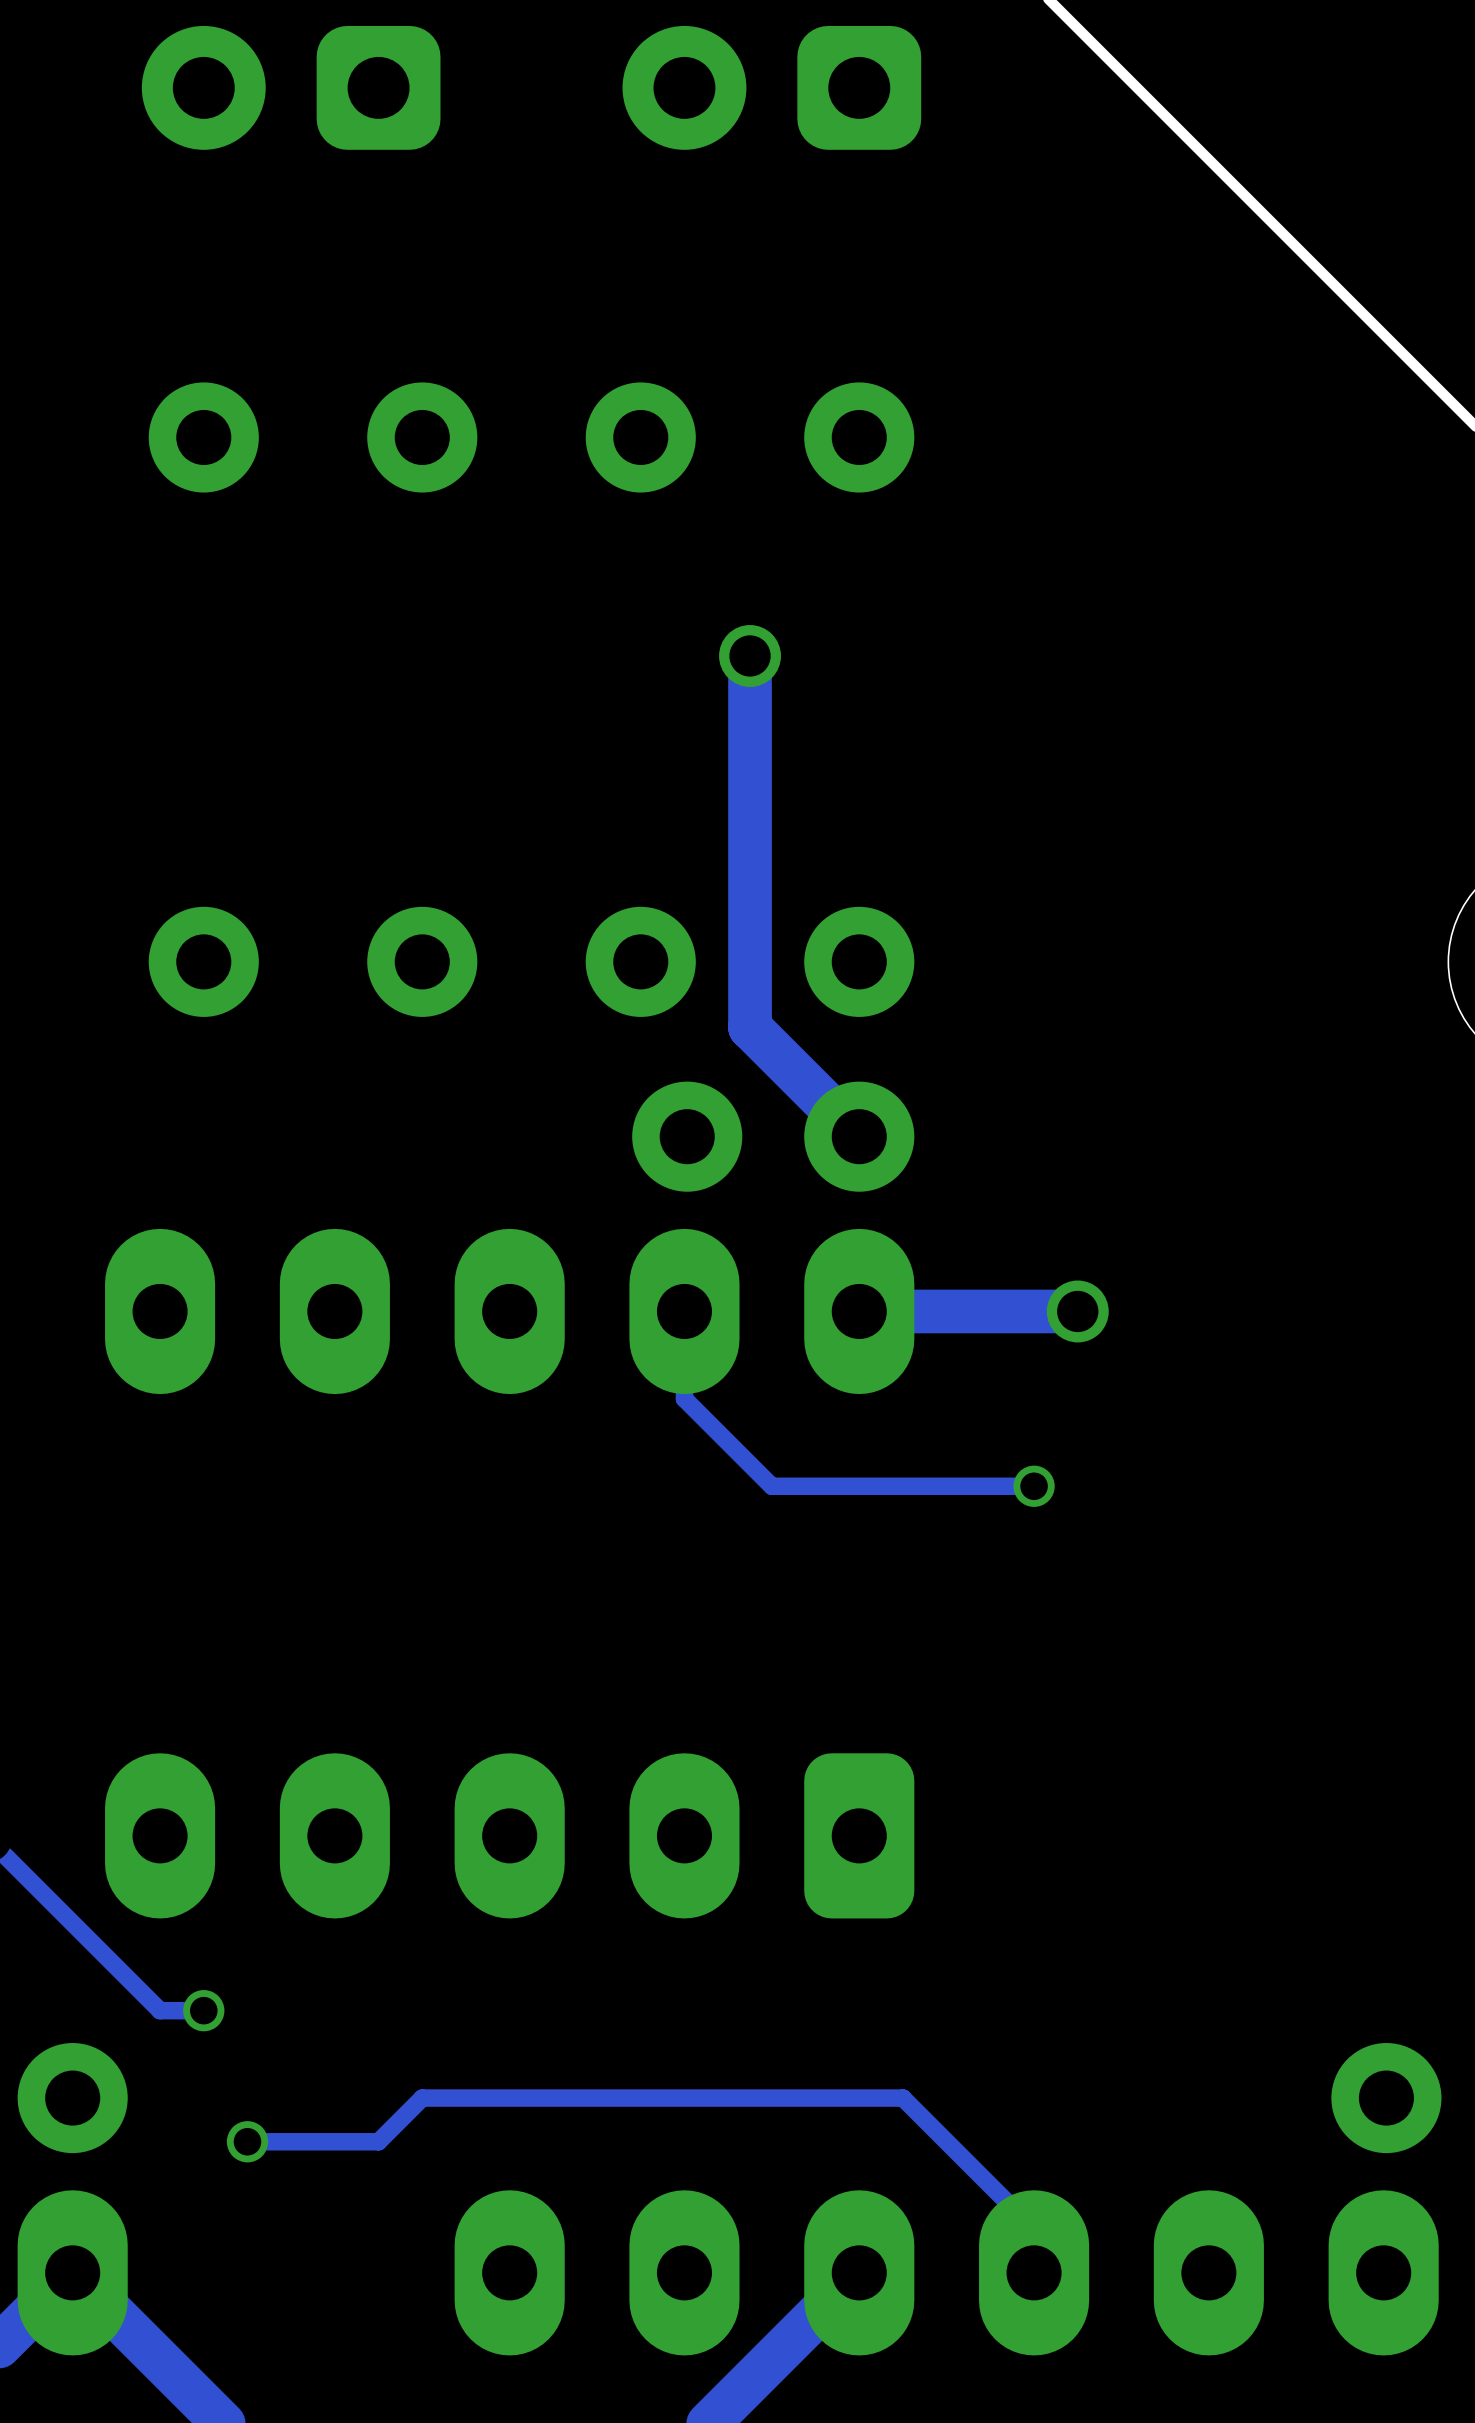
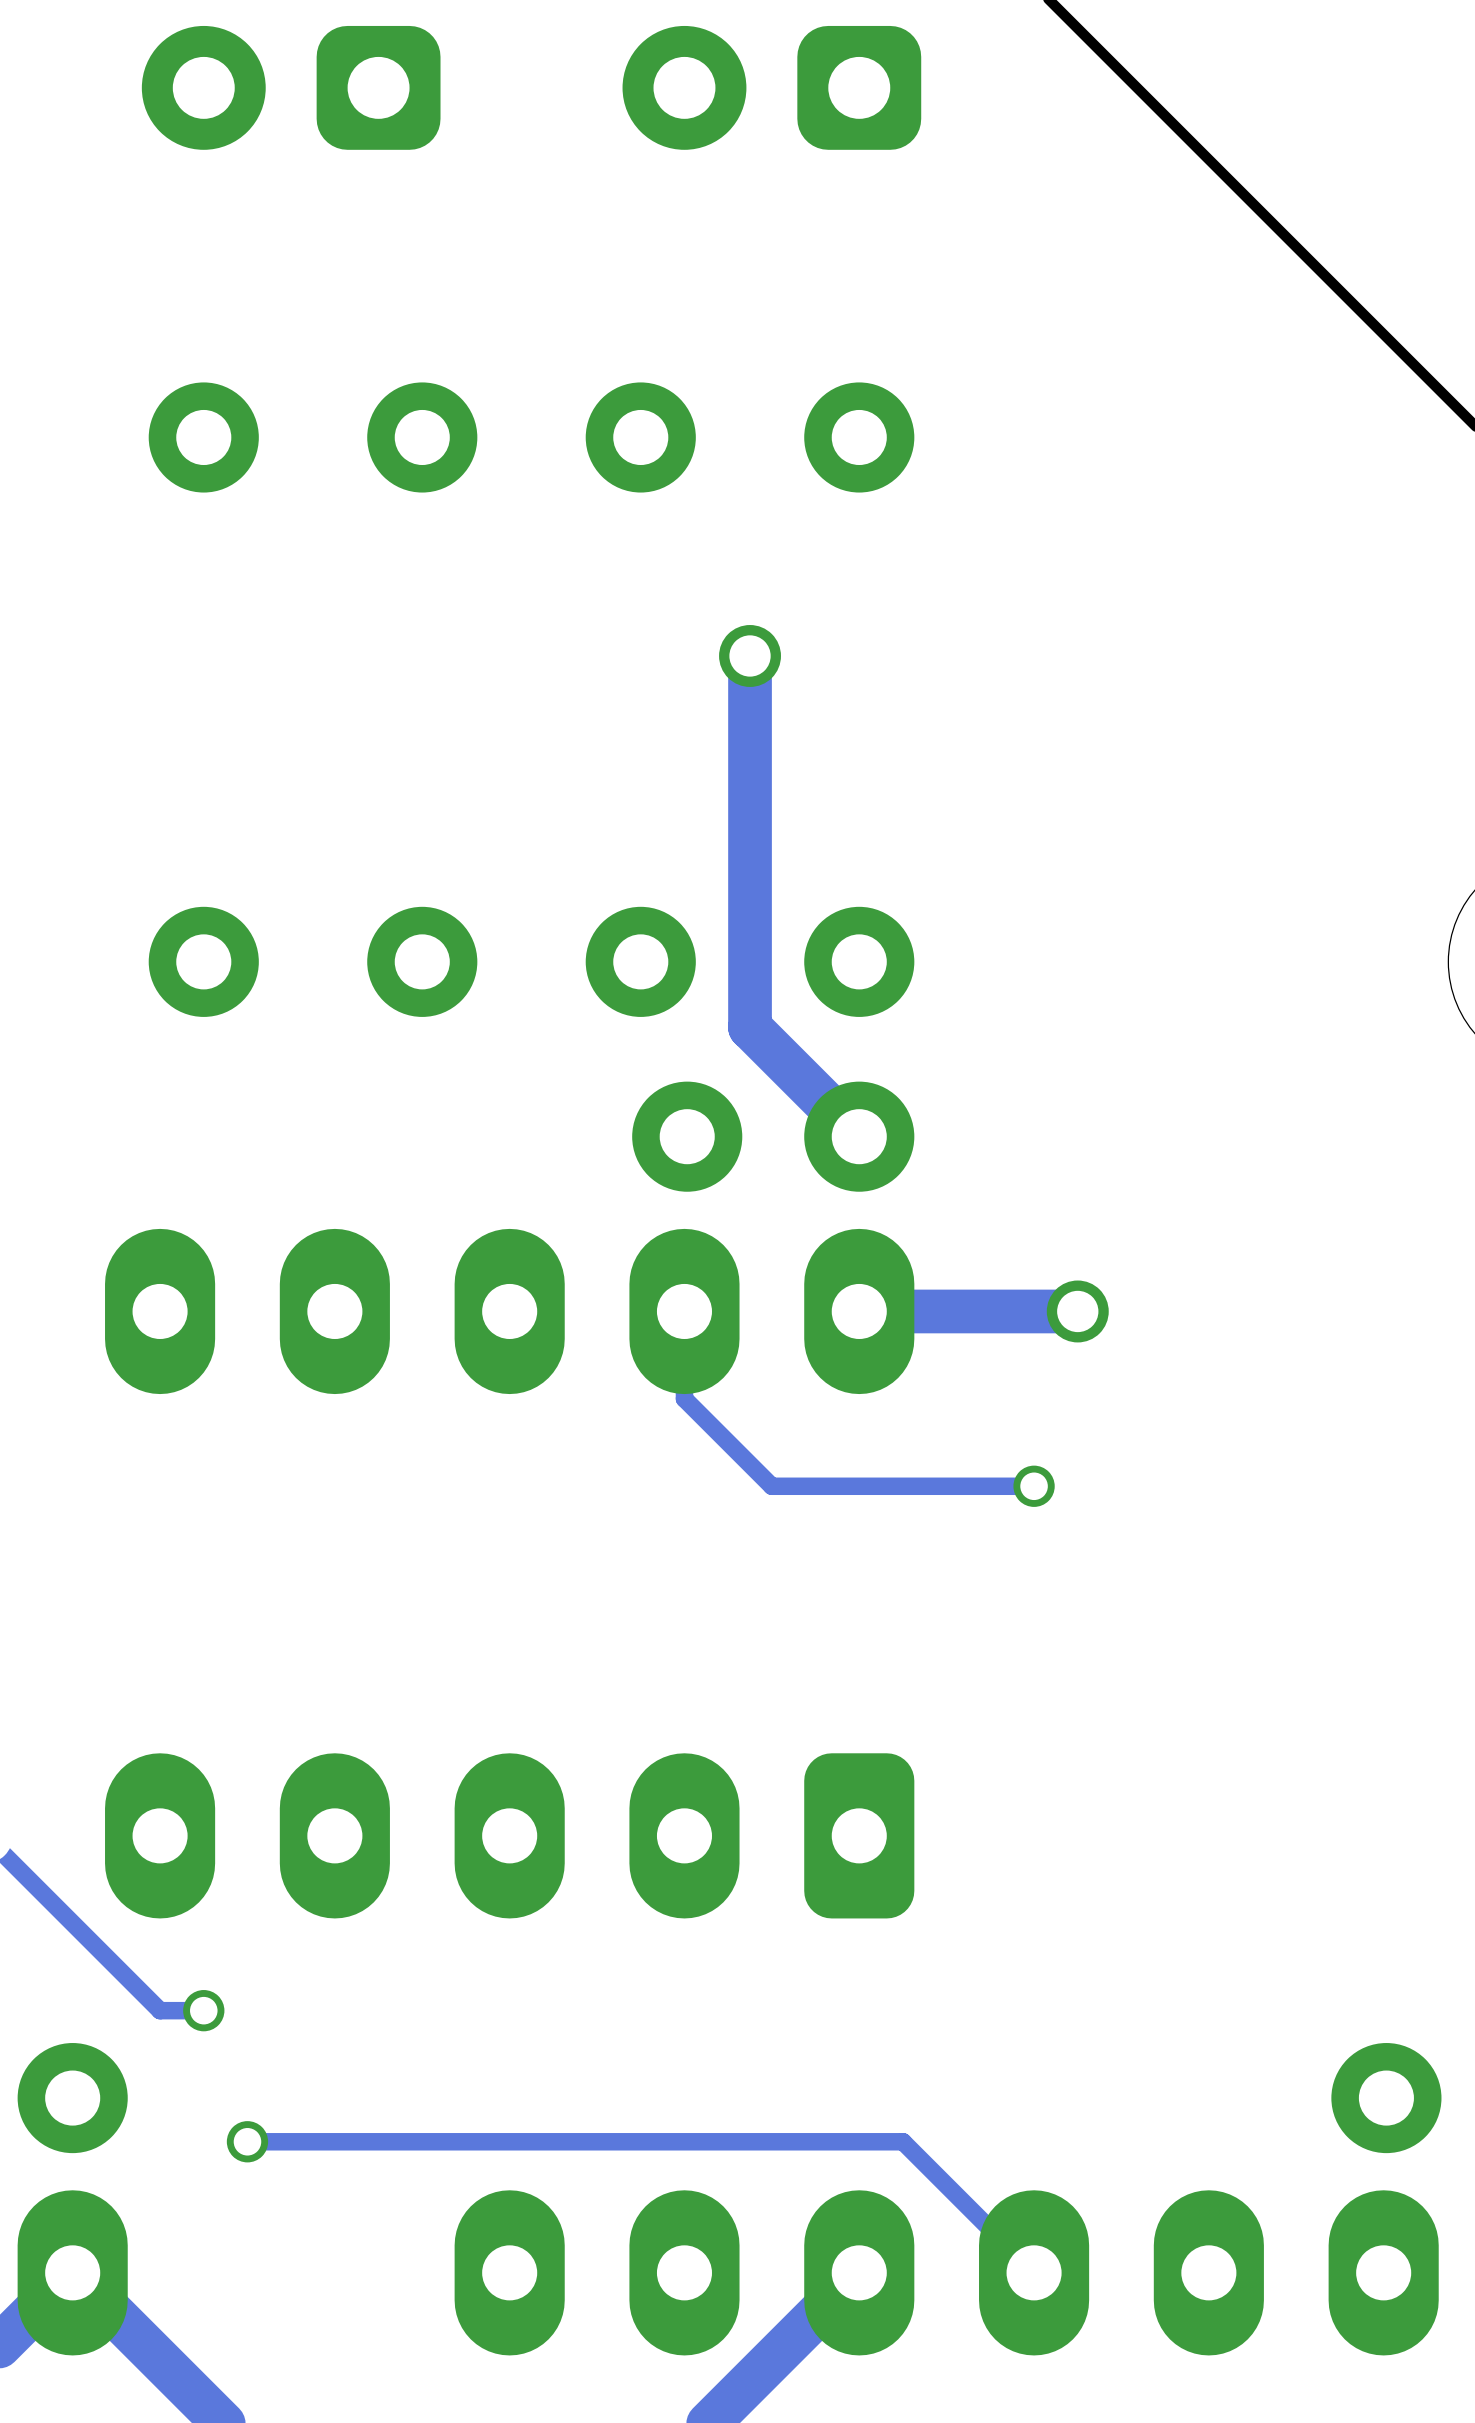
track: (378, 2141) (422, 2098) (902, 2098) (1034, 2229) (1034, 2272) -> (378, 2141) (902, 2141) (1034, 2272)

